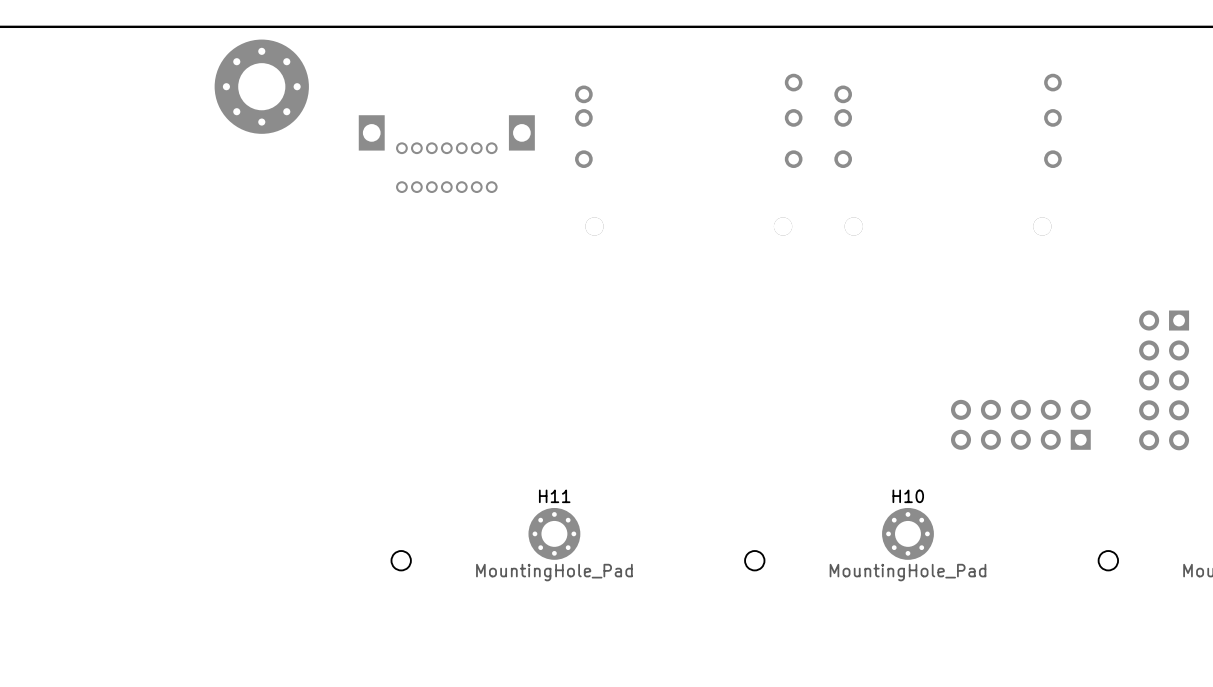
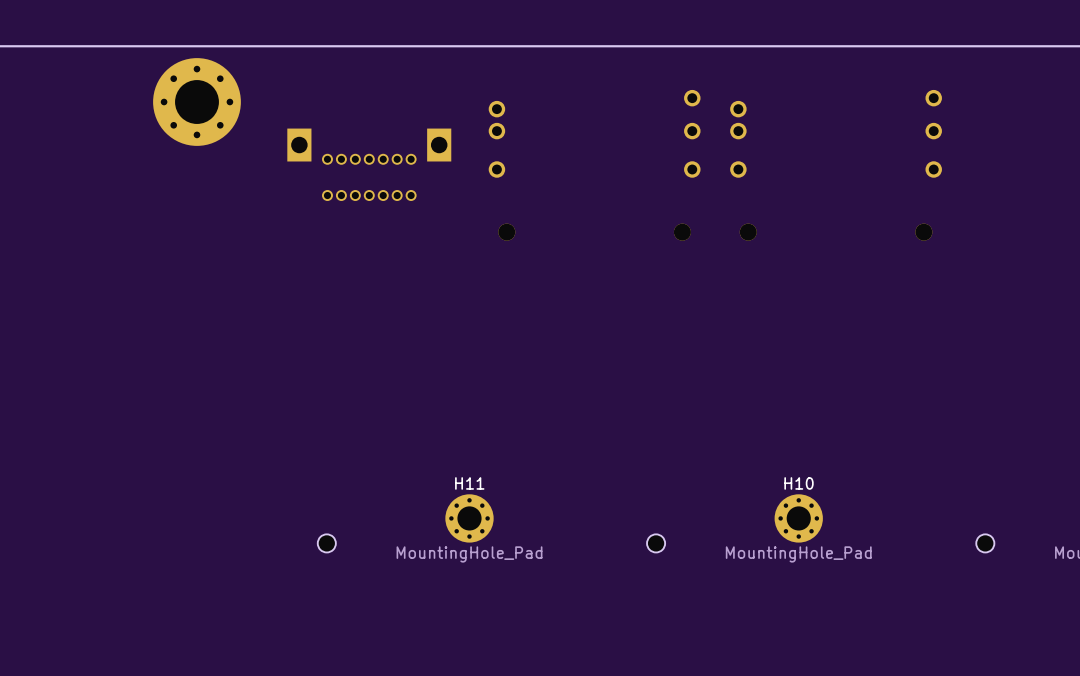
part: (1164, 380) -> none
part: (1020, 424) -> none

